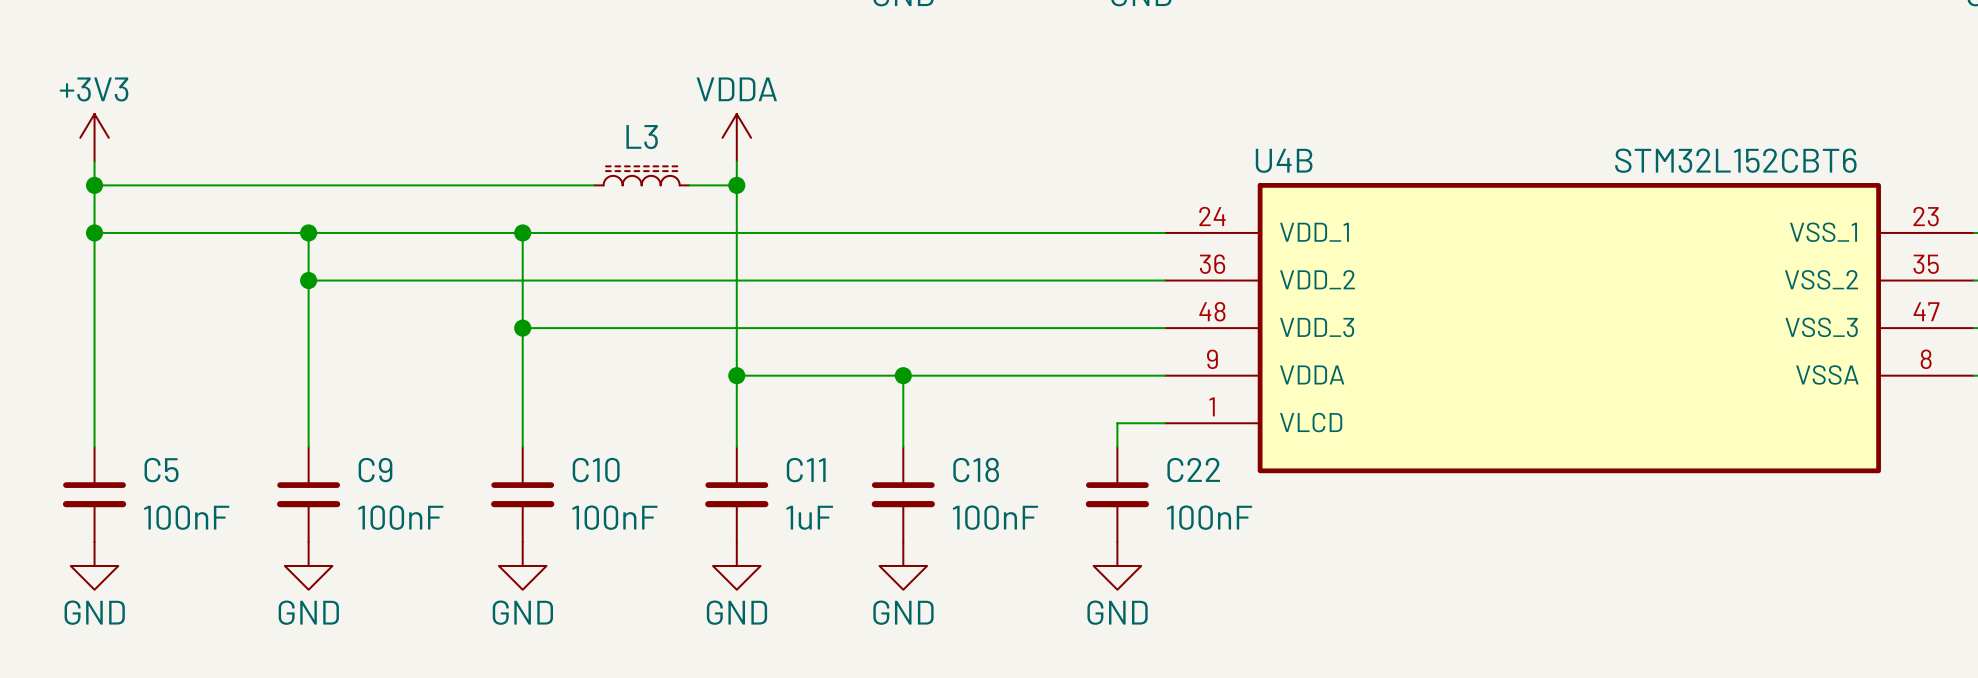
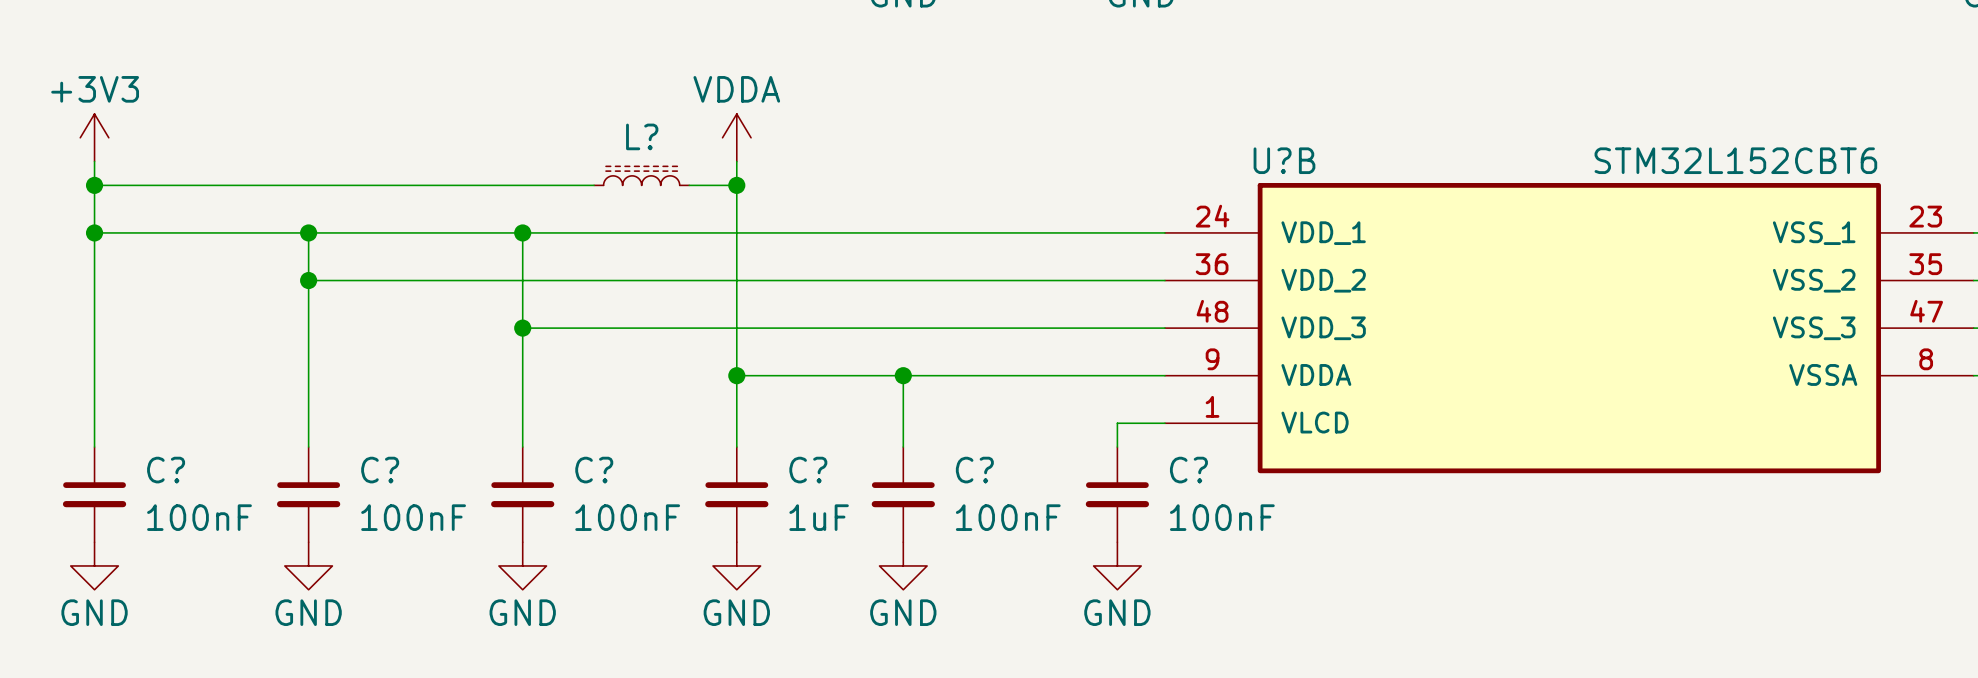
L3 name: L3 (642, 137) -> L? (642, 136)
U4B name: U4B (1284, 160) -> U?B (1284, 160)
C5 name: C5 (161, 470) -> C? (166, 470)
C9 name: C9 (375, 470) -> C? (380, 470)
C10 name: C10 (596, 470) -> C? (594, 470)
C11 name: C11 (806, 470) -> C? (808, 470)
C18 name: C18 (976, 470) -> C? (974, 470)
C22 name: C22 (1193, 470) -> C? (1188, 470)

